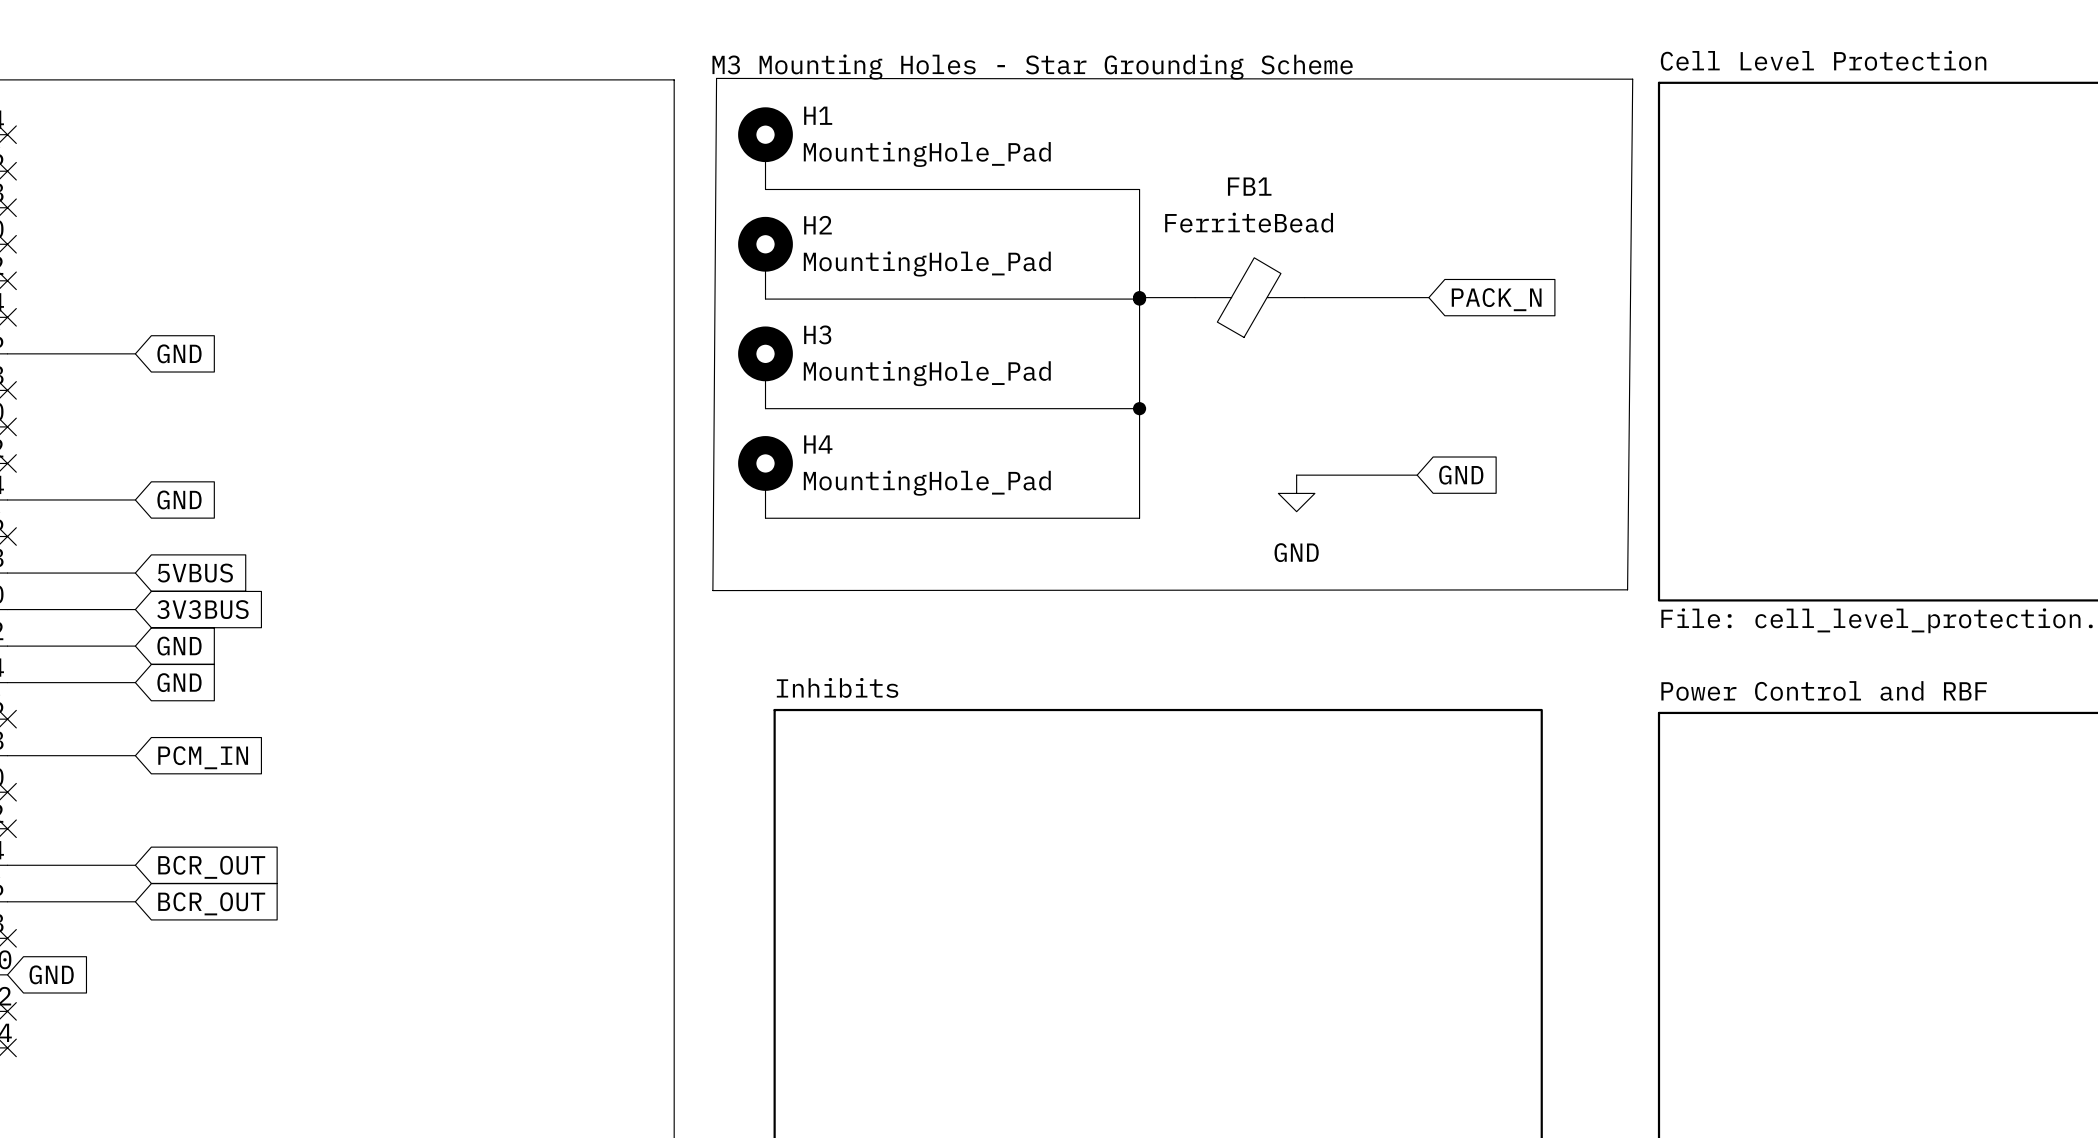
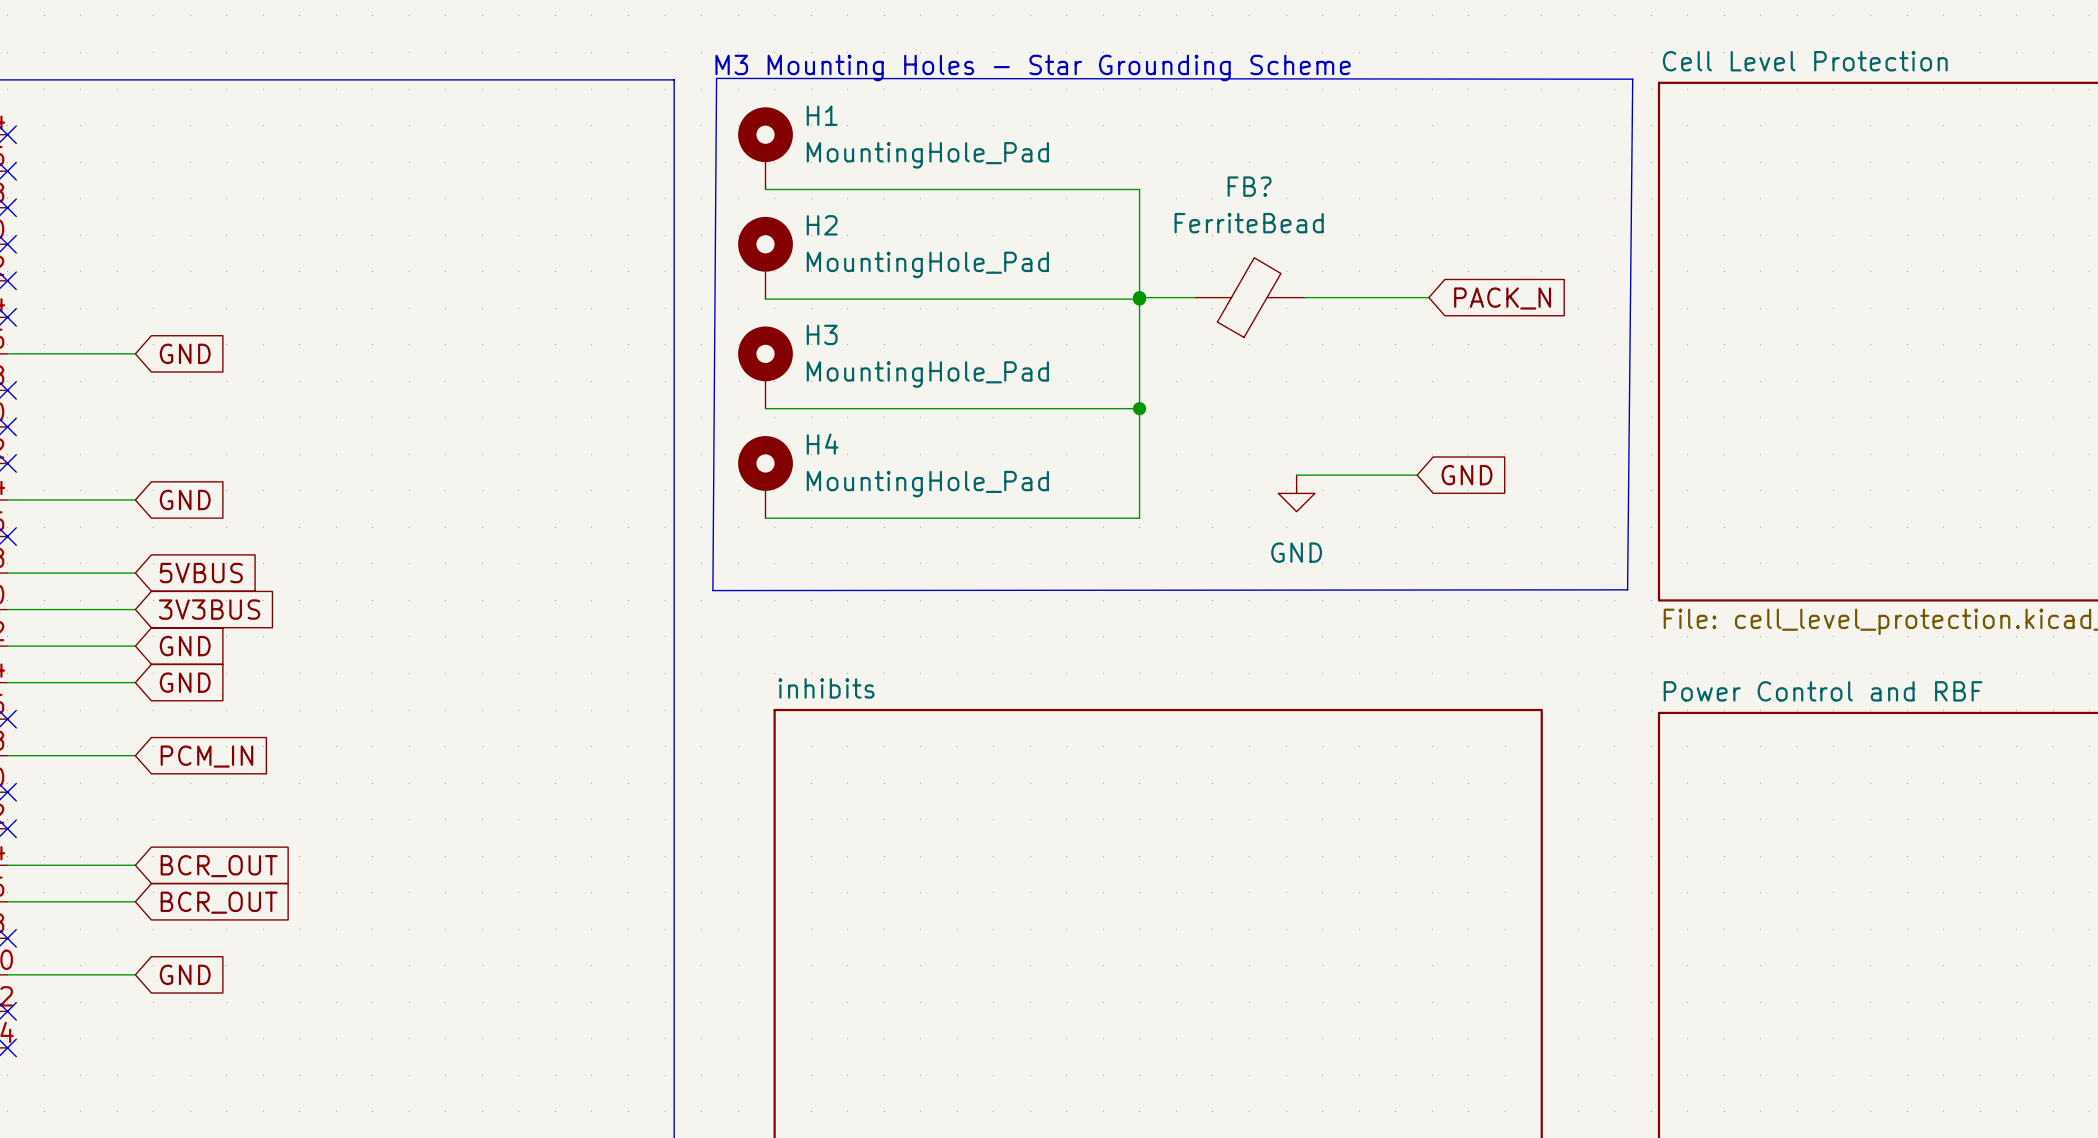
FB1 name: FB1 (1249, 186) -> FB? (1249, 186)
sheet Inhibits name: Inhibits (837, 687) -> inhibits (826, 688)
wire: none -> (7, 974) (135, 974)
global label position: GND (51, 974) -> GND (185, 974)

